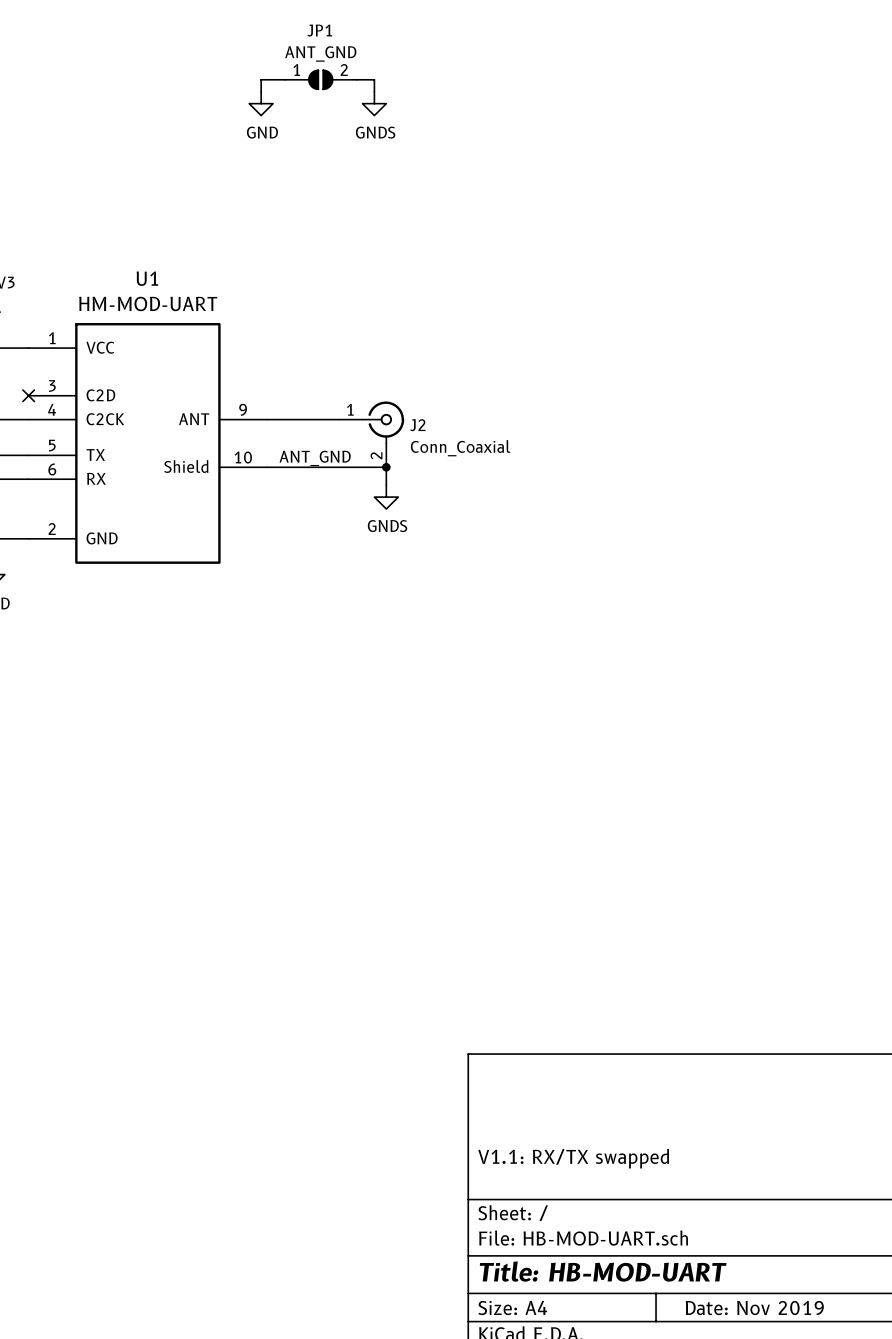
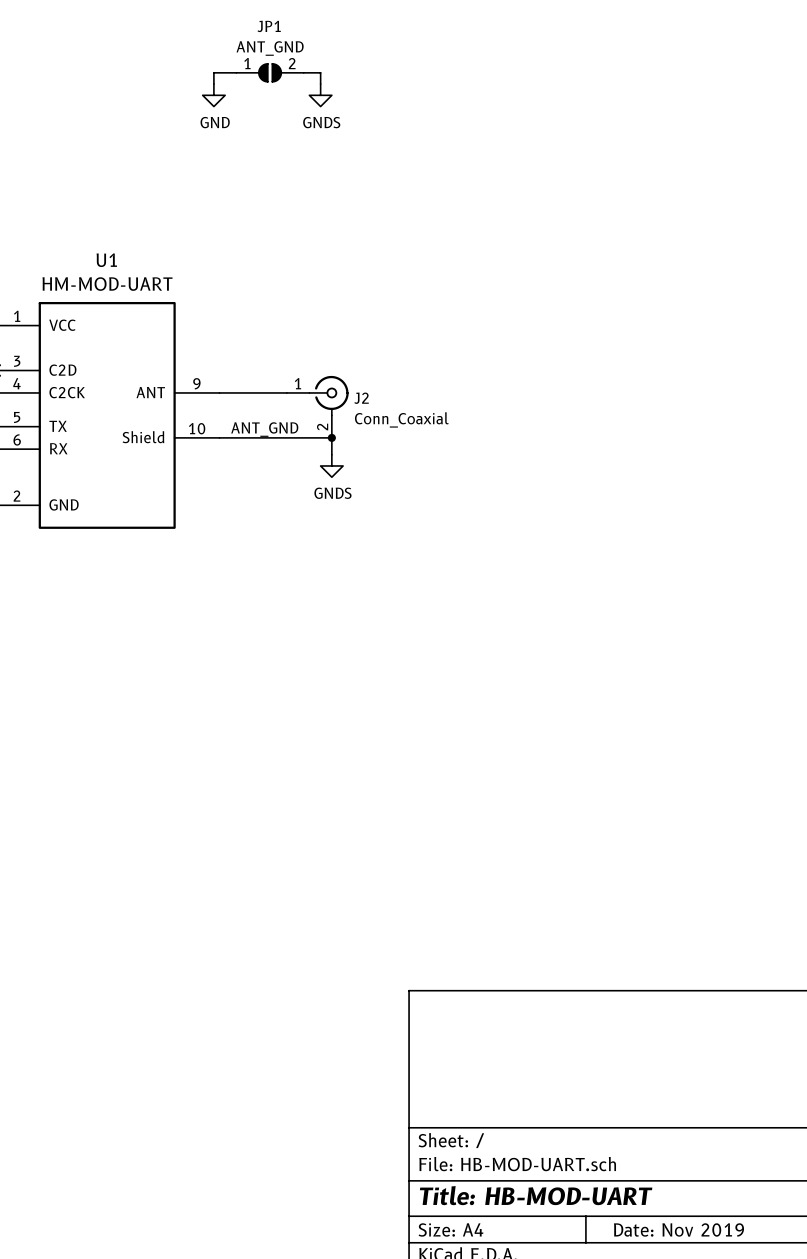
title block: V1.1: RX/TX swapped (573, 1158) -> none

